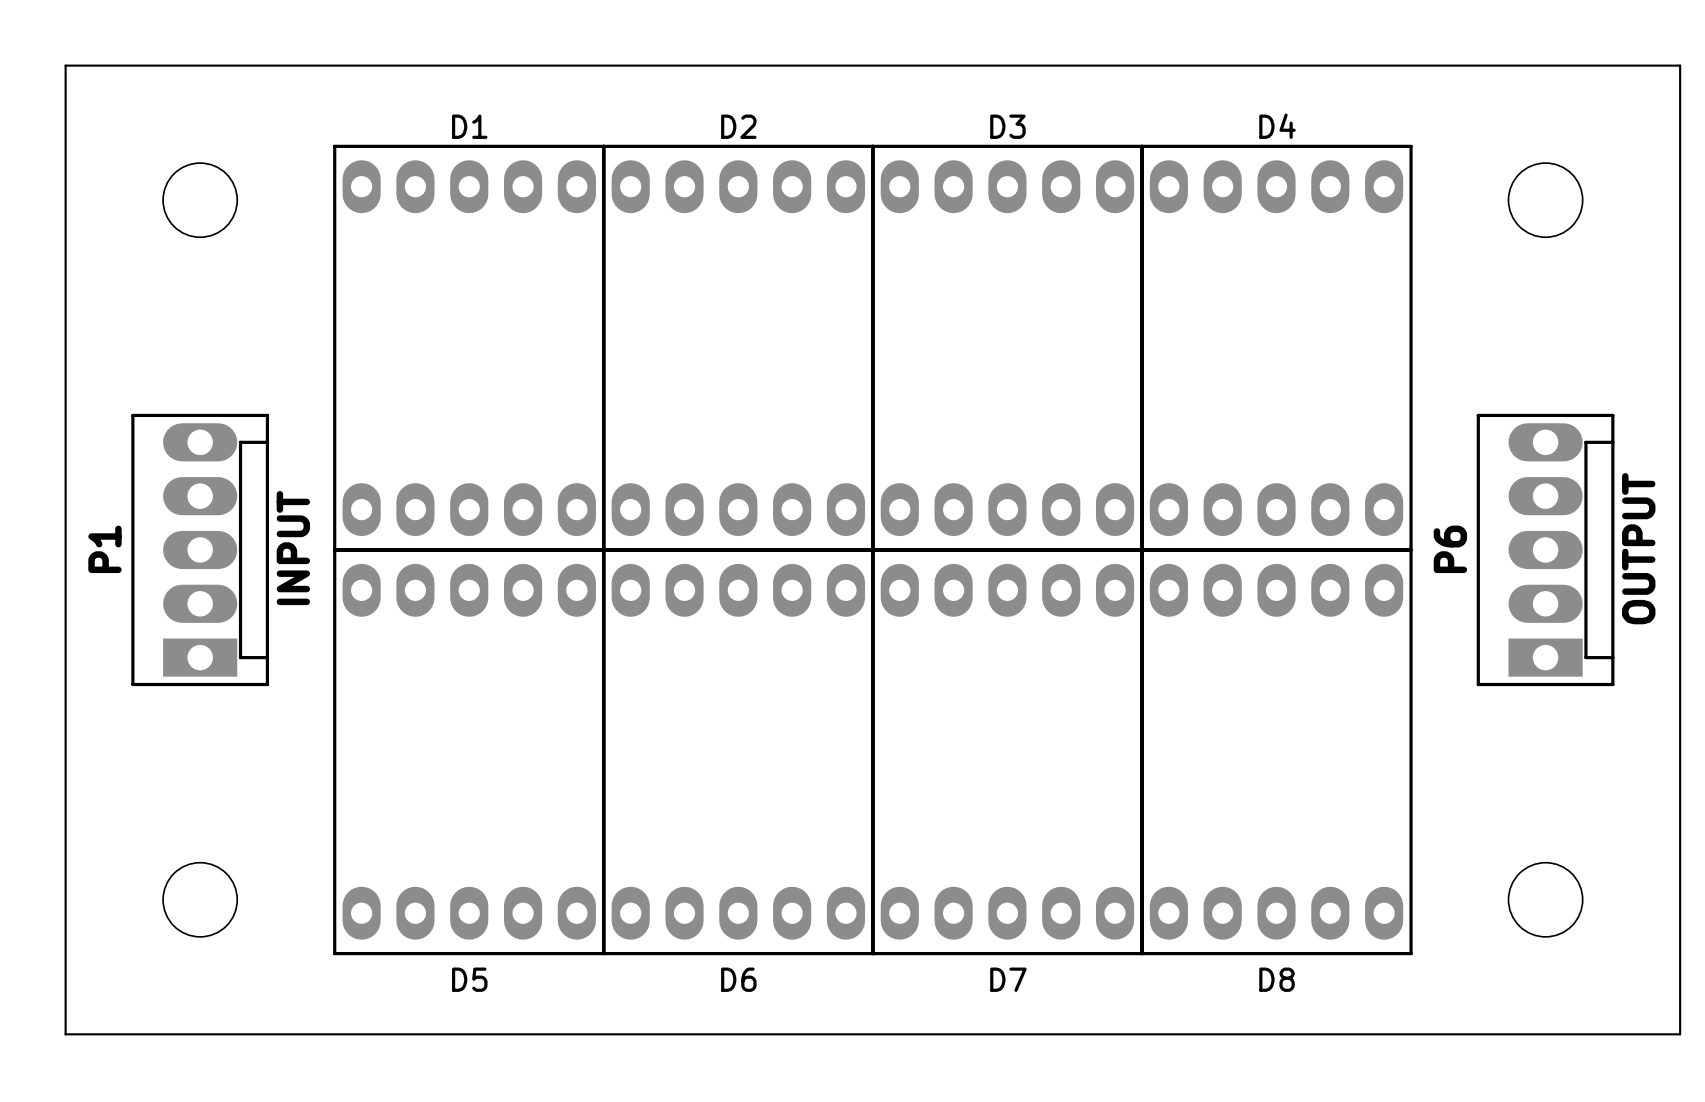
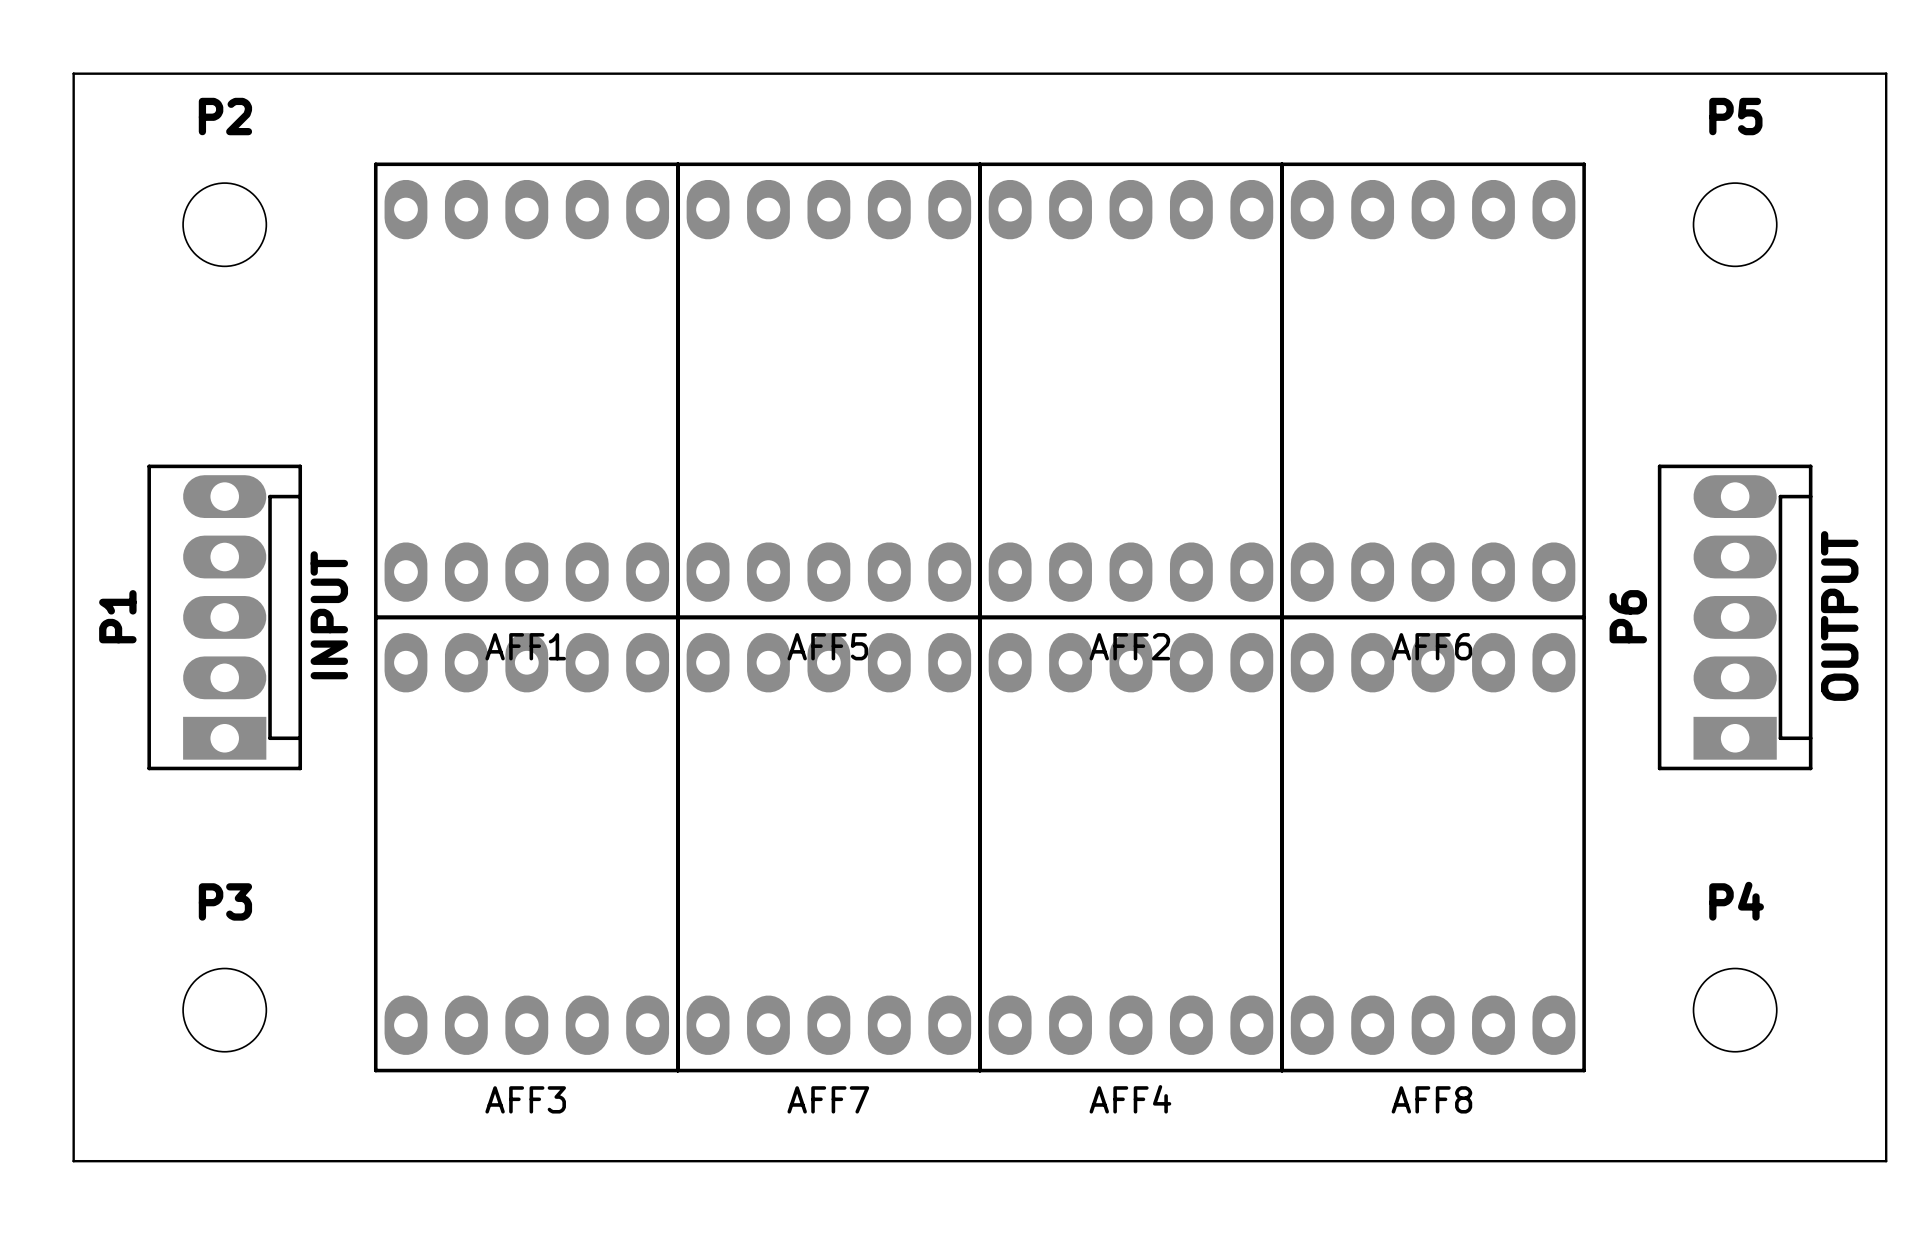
P2 name: none -> P2 (225, 116)
P5 name: none -> P5 (1735, 116)
D1 name: D1 (469, 126) -> AFF1 (525, 646)
D2 name: D2 (738, 126) -> AFF5 (827, 646)
D3 name: D3 (1007, 126) -> AFF2 (1129, 646)
D4 name: D4 (1277, 126) -> AFF6 (1431, 646)
P4 name: none -> P4 (1736, 901)
P3 name: none -> P3 (225, 901)
D5 name: D5 (469, 979) -> AFF3 (525, 1099)
D6 name: D6 (738, 979) -> AFF7 (828, 1099)
D7 name: D7 (1008, 979) -> AFF4 (1130, 1099)
D8 name: D8 (1277, 979) -> AFF8 (1431, 1099)

